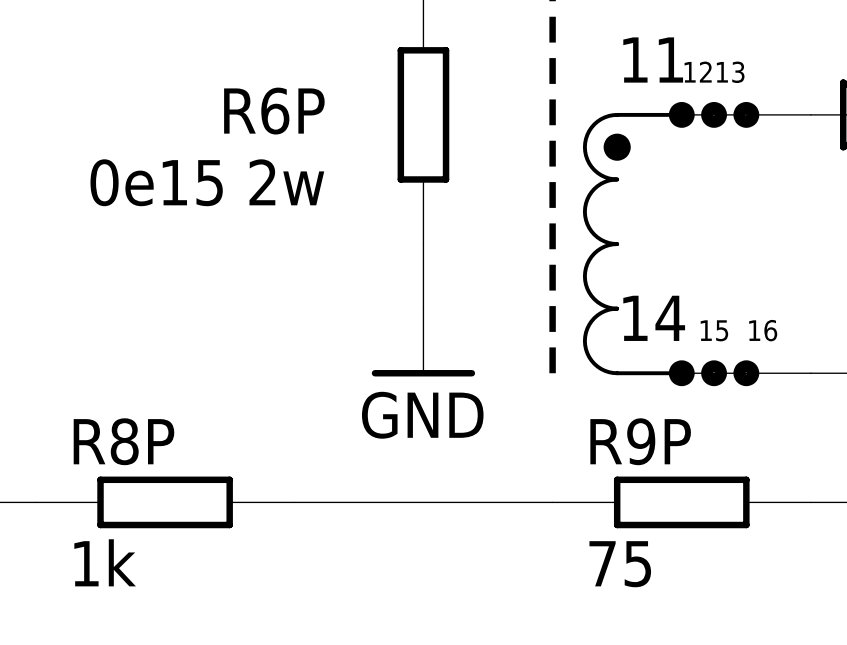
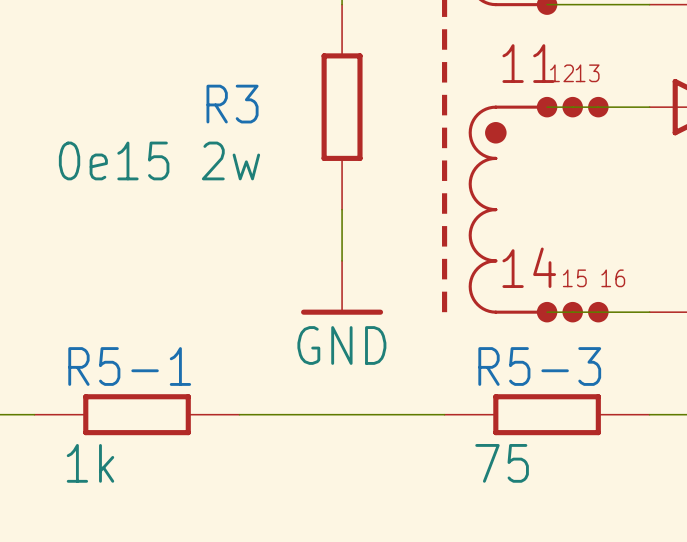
R6P name: R6P (274, 111) -> R3 (232, 104)
R8P name: R8P (123, 441) -> R5-1 (129, 366)
R9P name: R9P (640, 441) -> R5-3 (539, 366)

